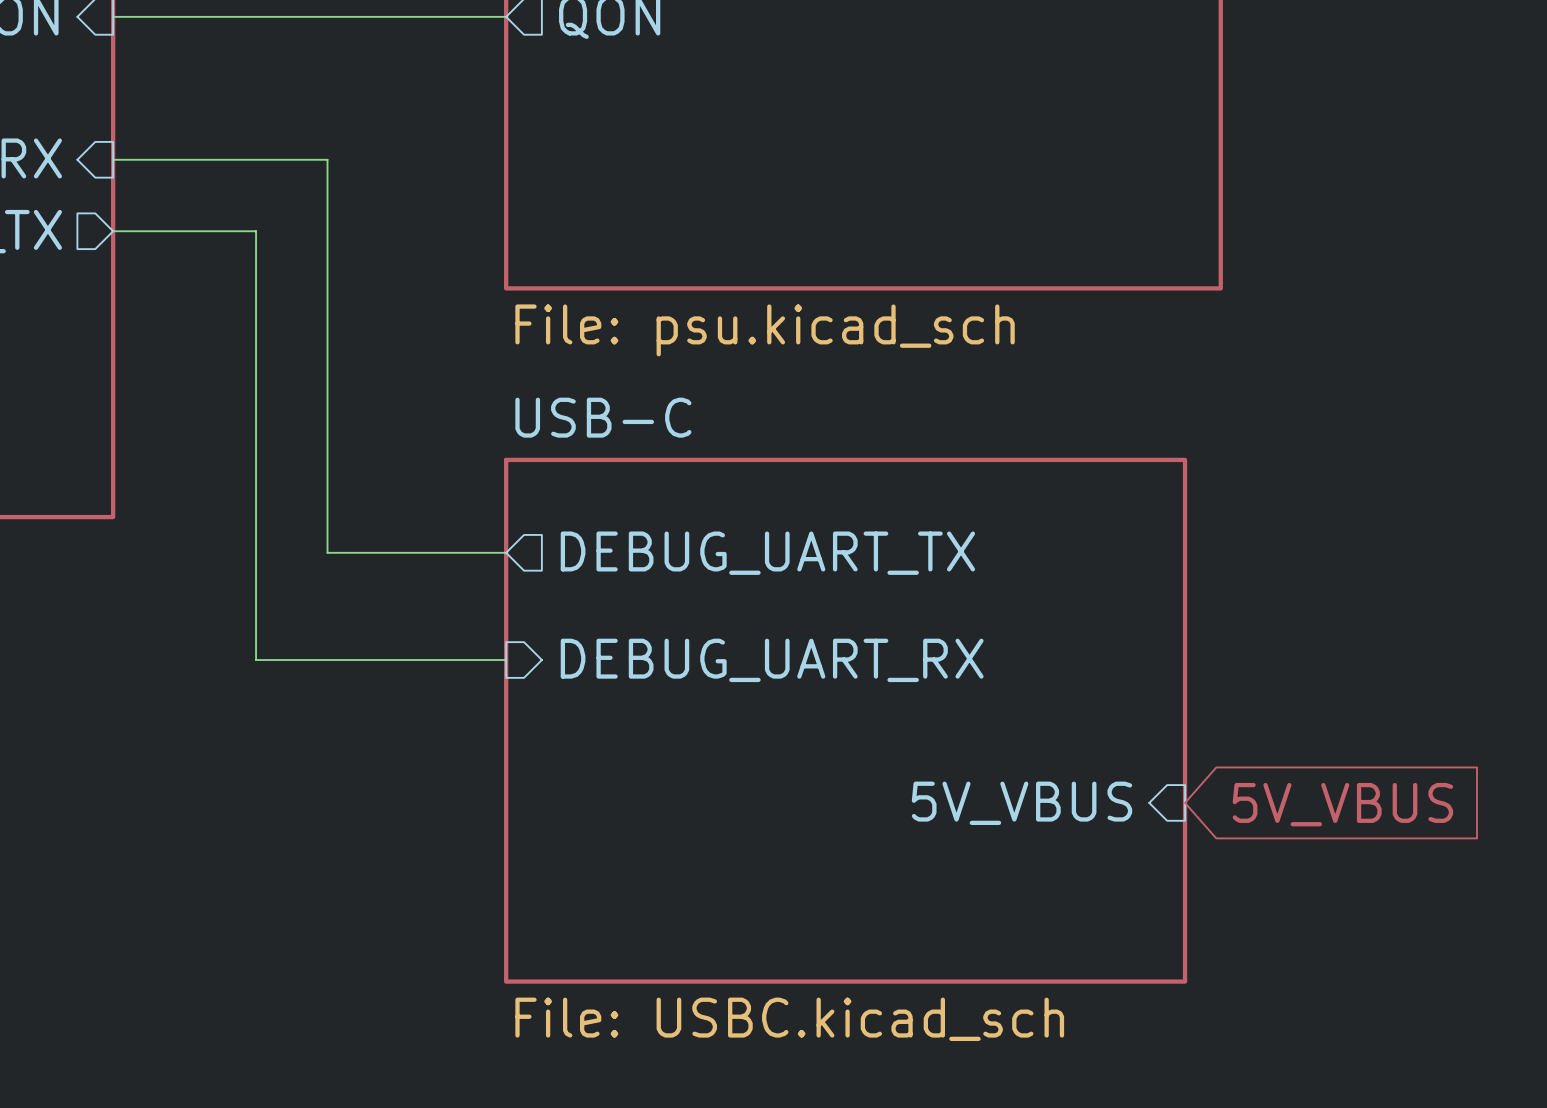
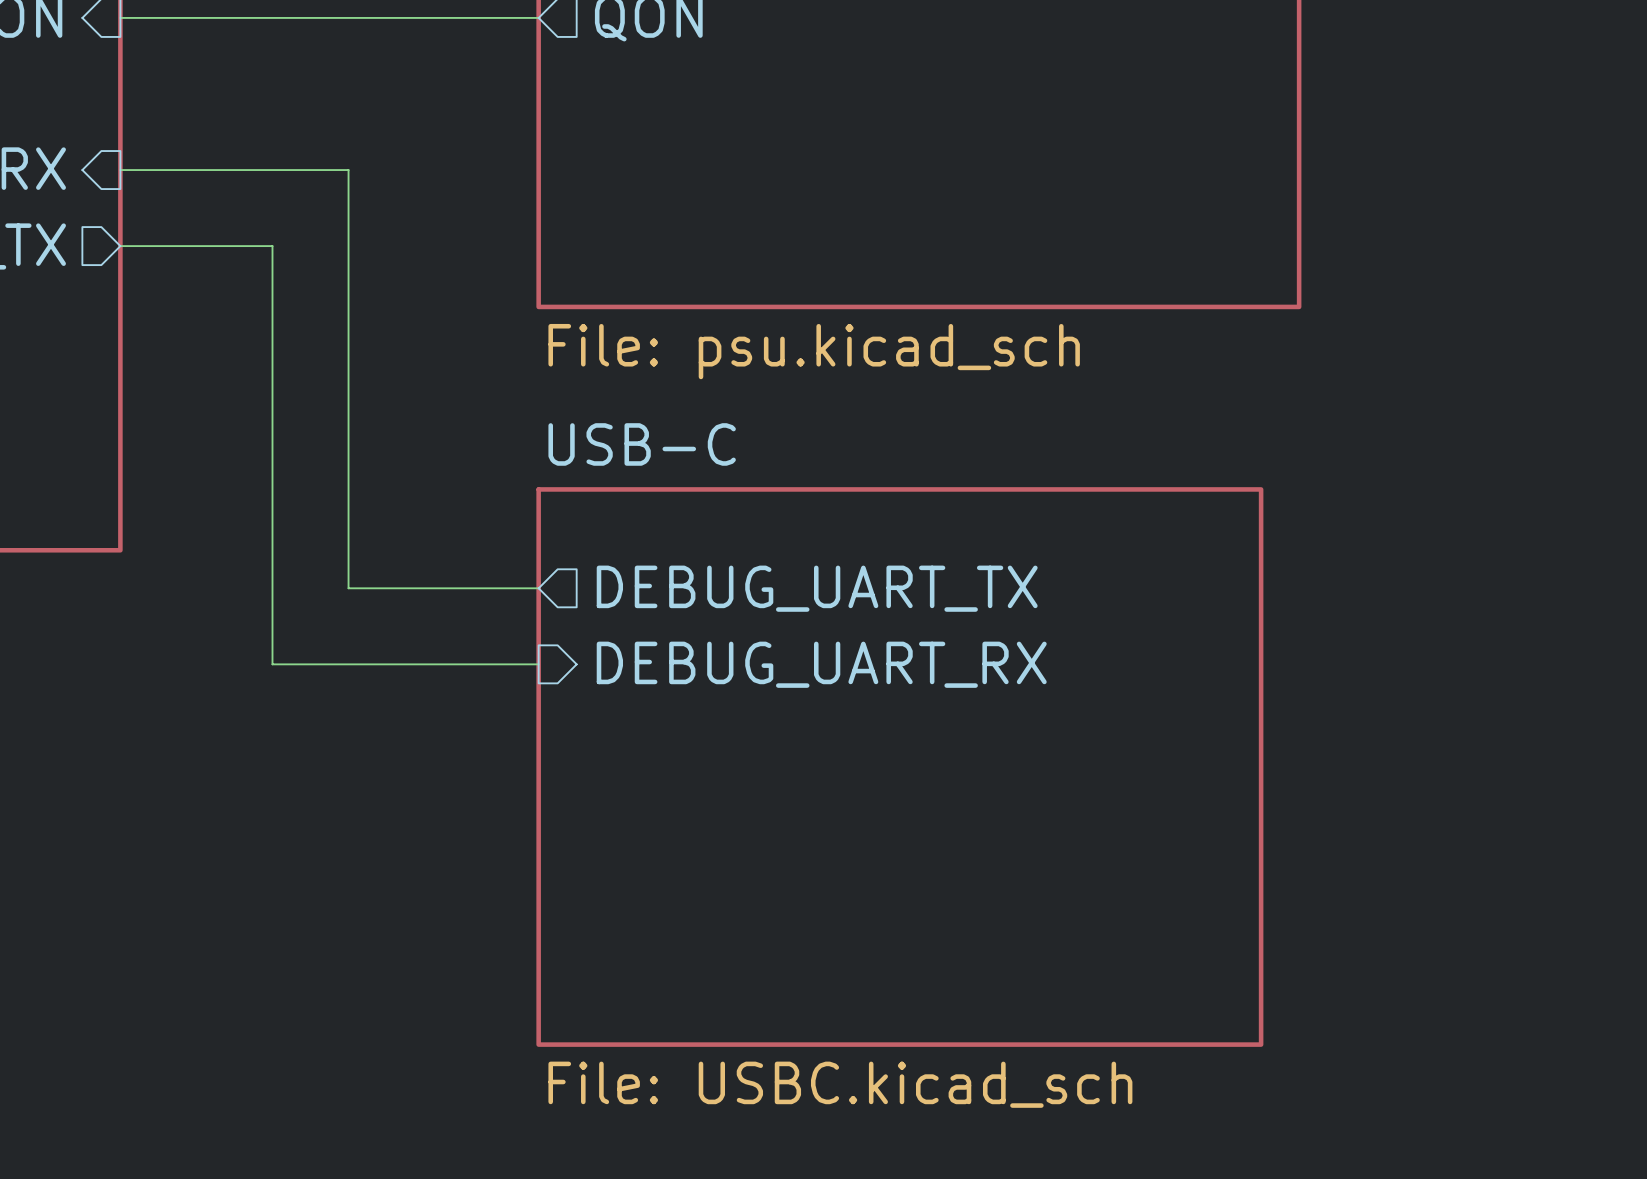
wire: (256, 624) (256, 660) (506, 660) -> (272, 664) (538, 664)
sheet pin position: DEBUG_UART_RX (772, 660) -> DEBUG_UART_RX (821, 664)
sheet pin: 5V_VBUS (1021, 803) -> none
global label: 5V_VBUS (1342, 804) -> none

